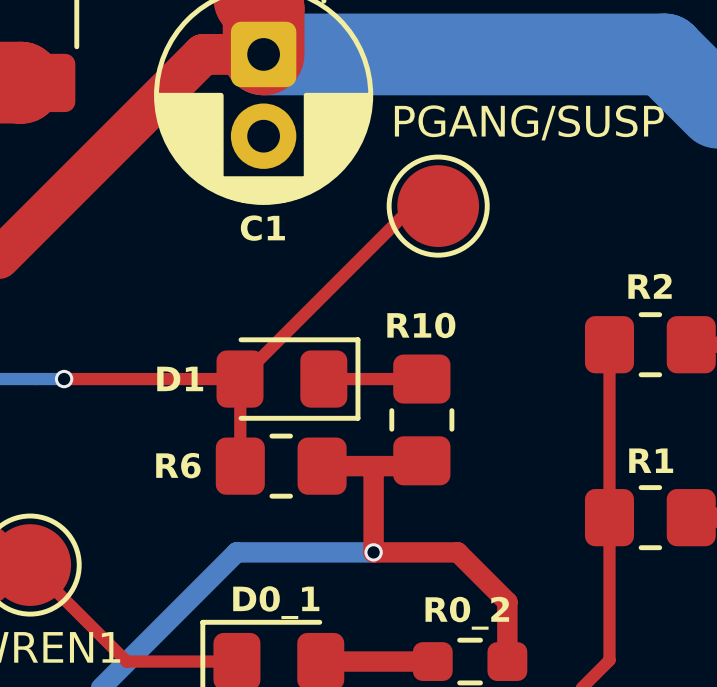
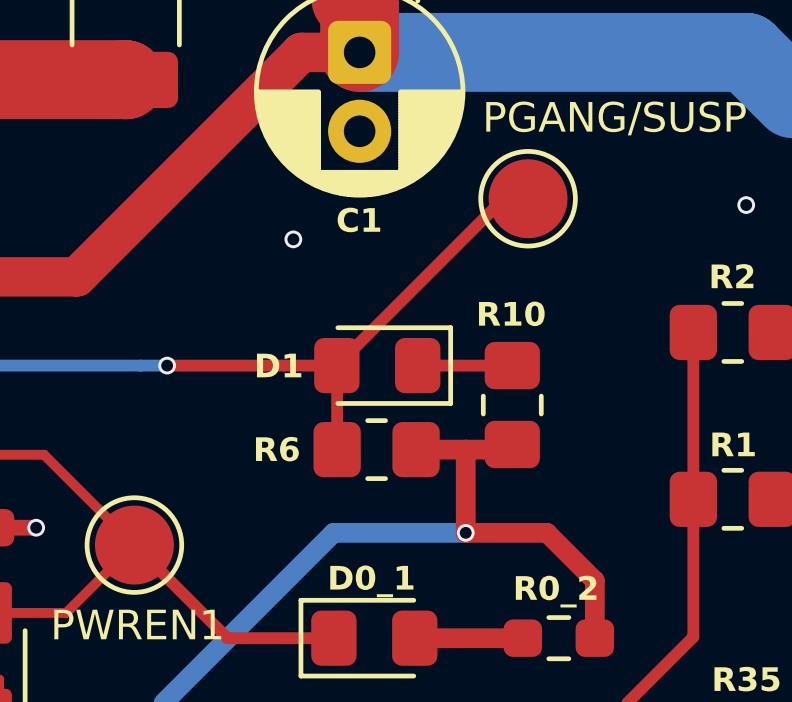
via: none -> (746, 205)
via: none -> (293, 239)

